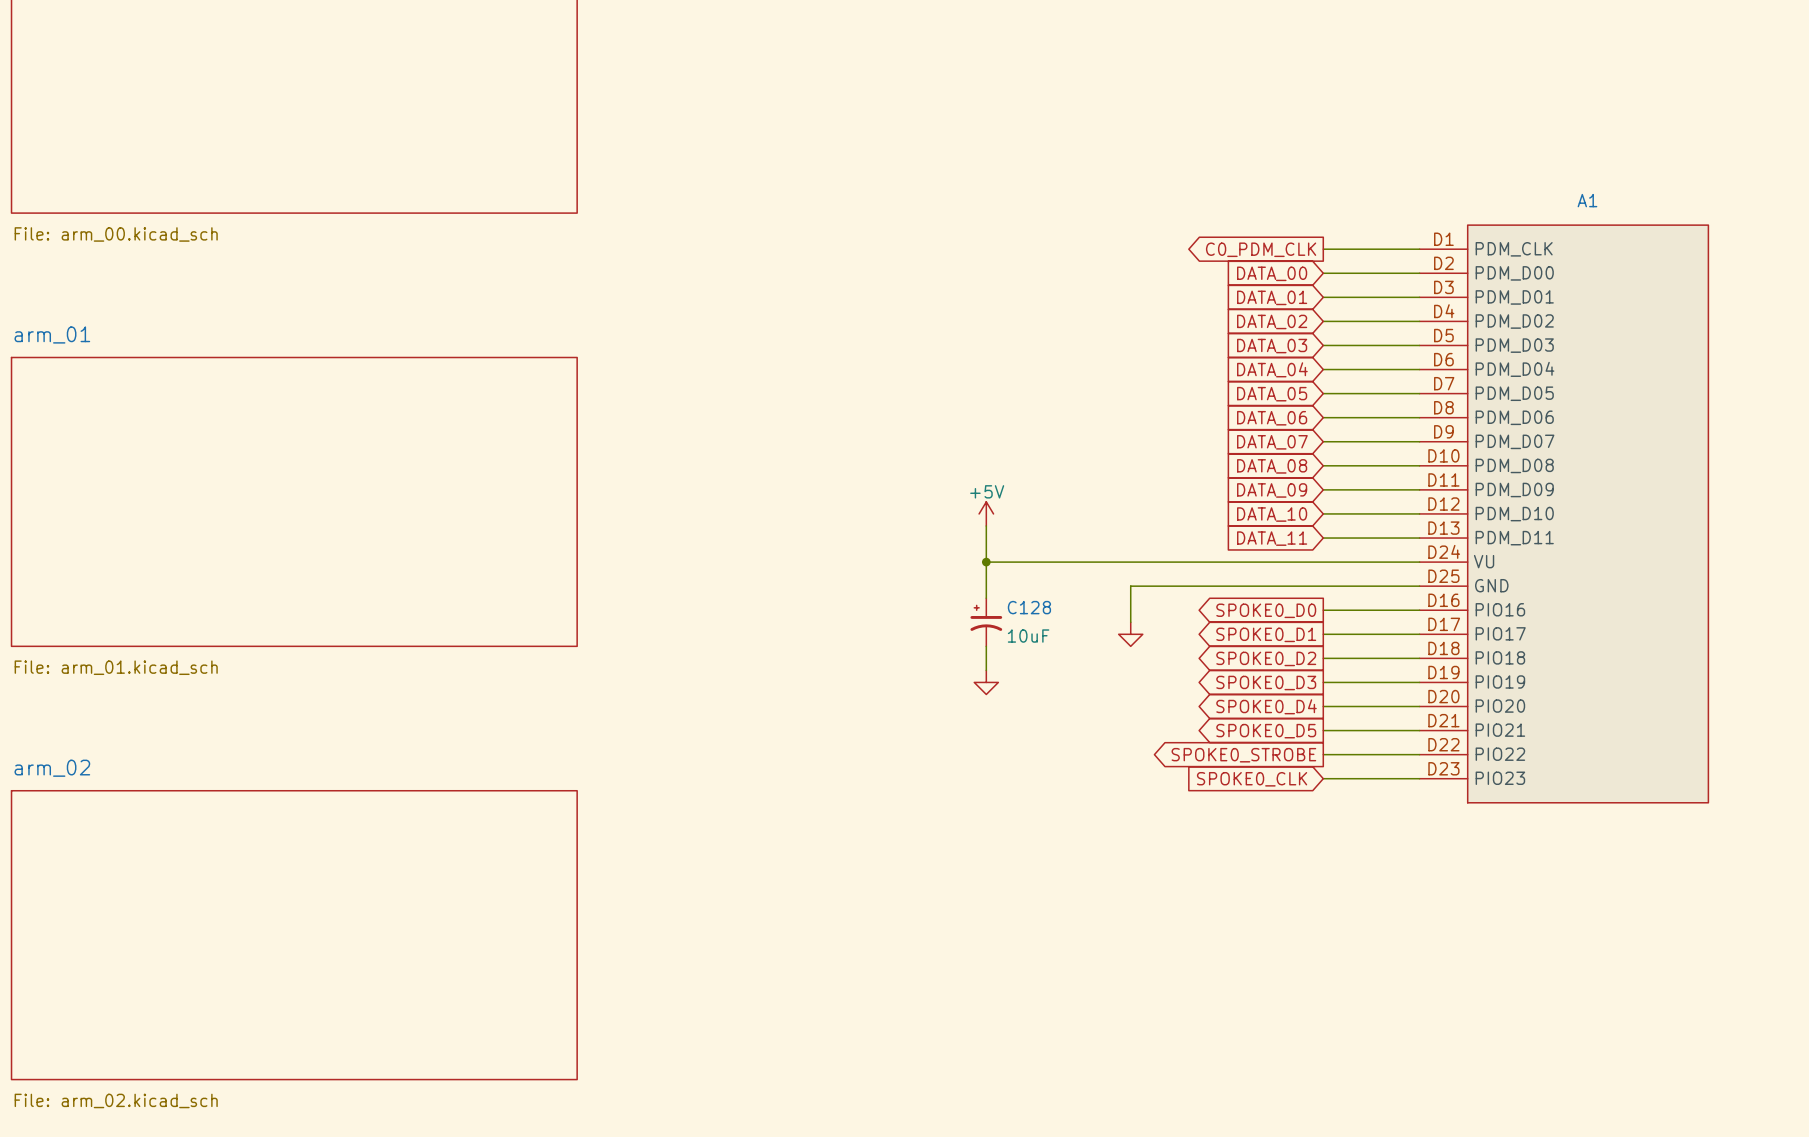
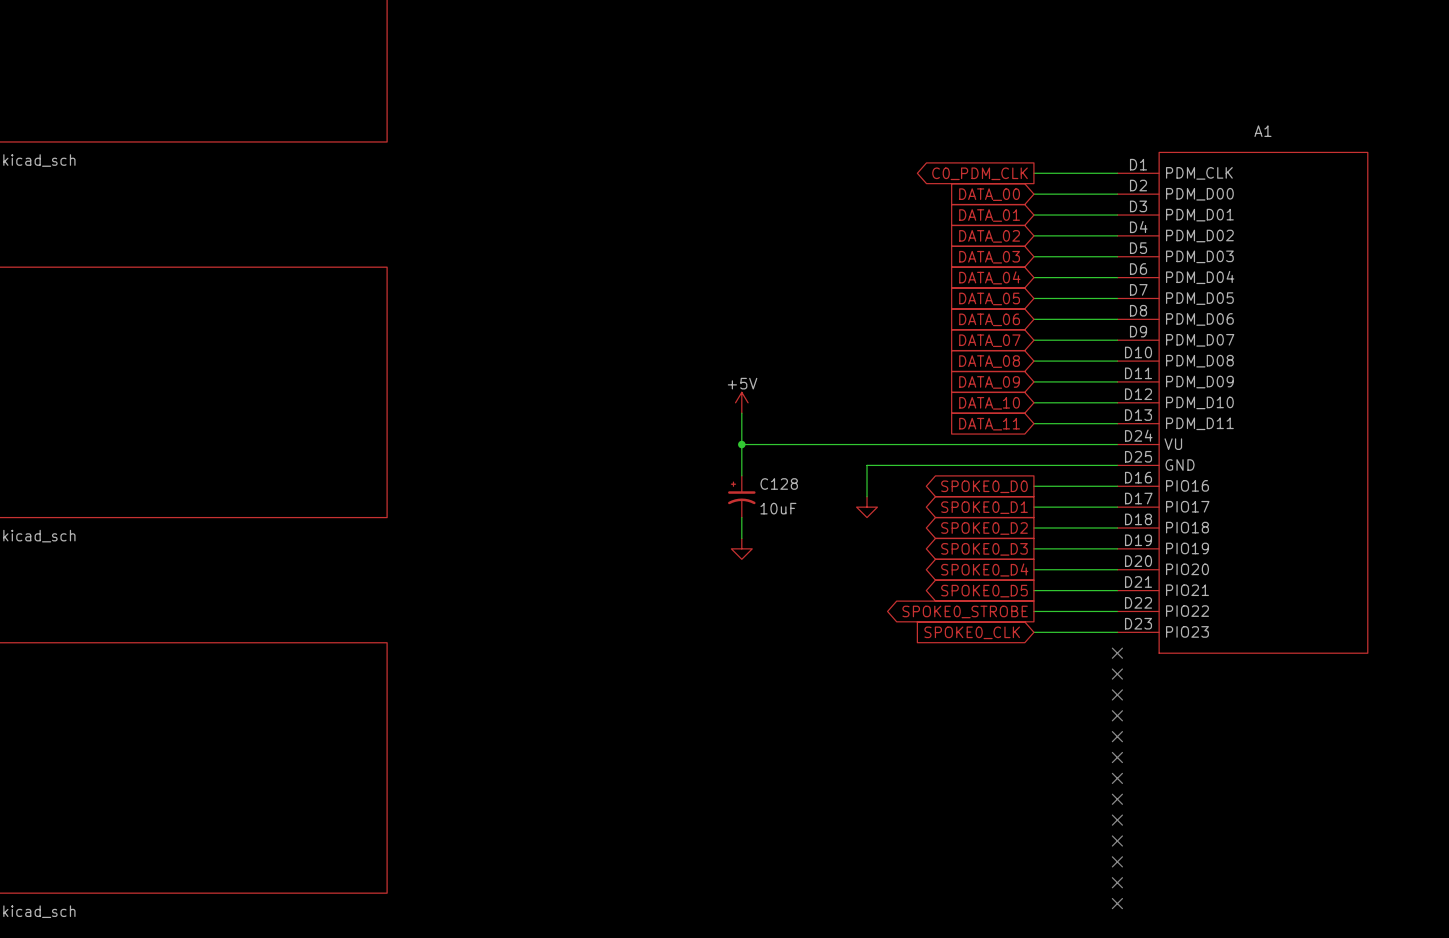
no-connect mark: none -> (1117, 653)
no-connect mark: none -> (1117, 674)
no-connect mark: none -> (1117, 694)
no-connect mark: none -> (1117, 715)
no-connect mark: none -> (1117, 736)
no-connect mark: none -> (1117, 757)
no-connect mark: none -> (1117, 778)
no-connect mark: none -> (1117, 799)
no-connect mark: none -> (1117, 820)
no-connect mark: none -> (1117, 840)
no-connect mark: none -> (1117, 861)
no-connect mark: none -> (1117, 882)
no-connect mark: none -> (1117, 903)

